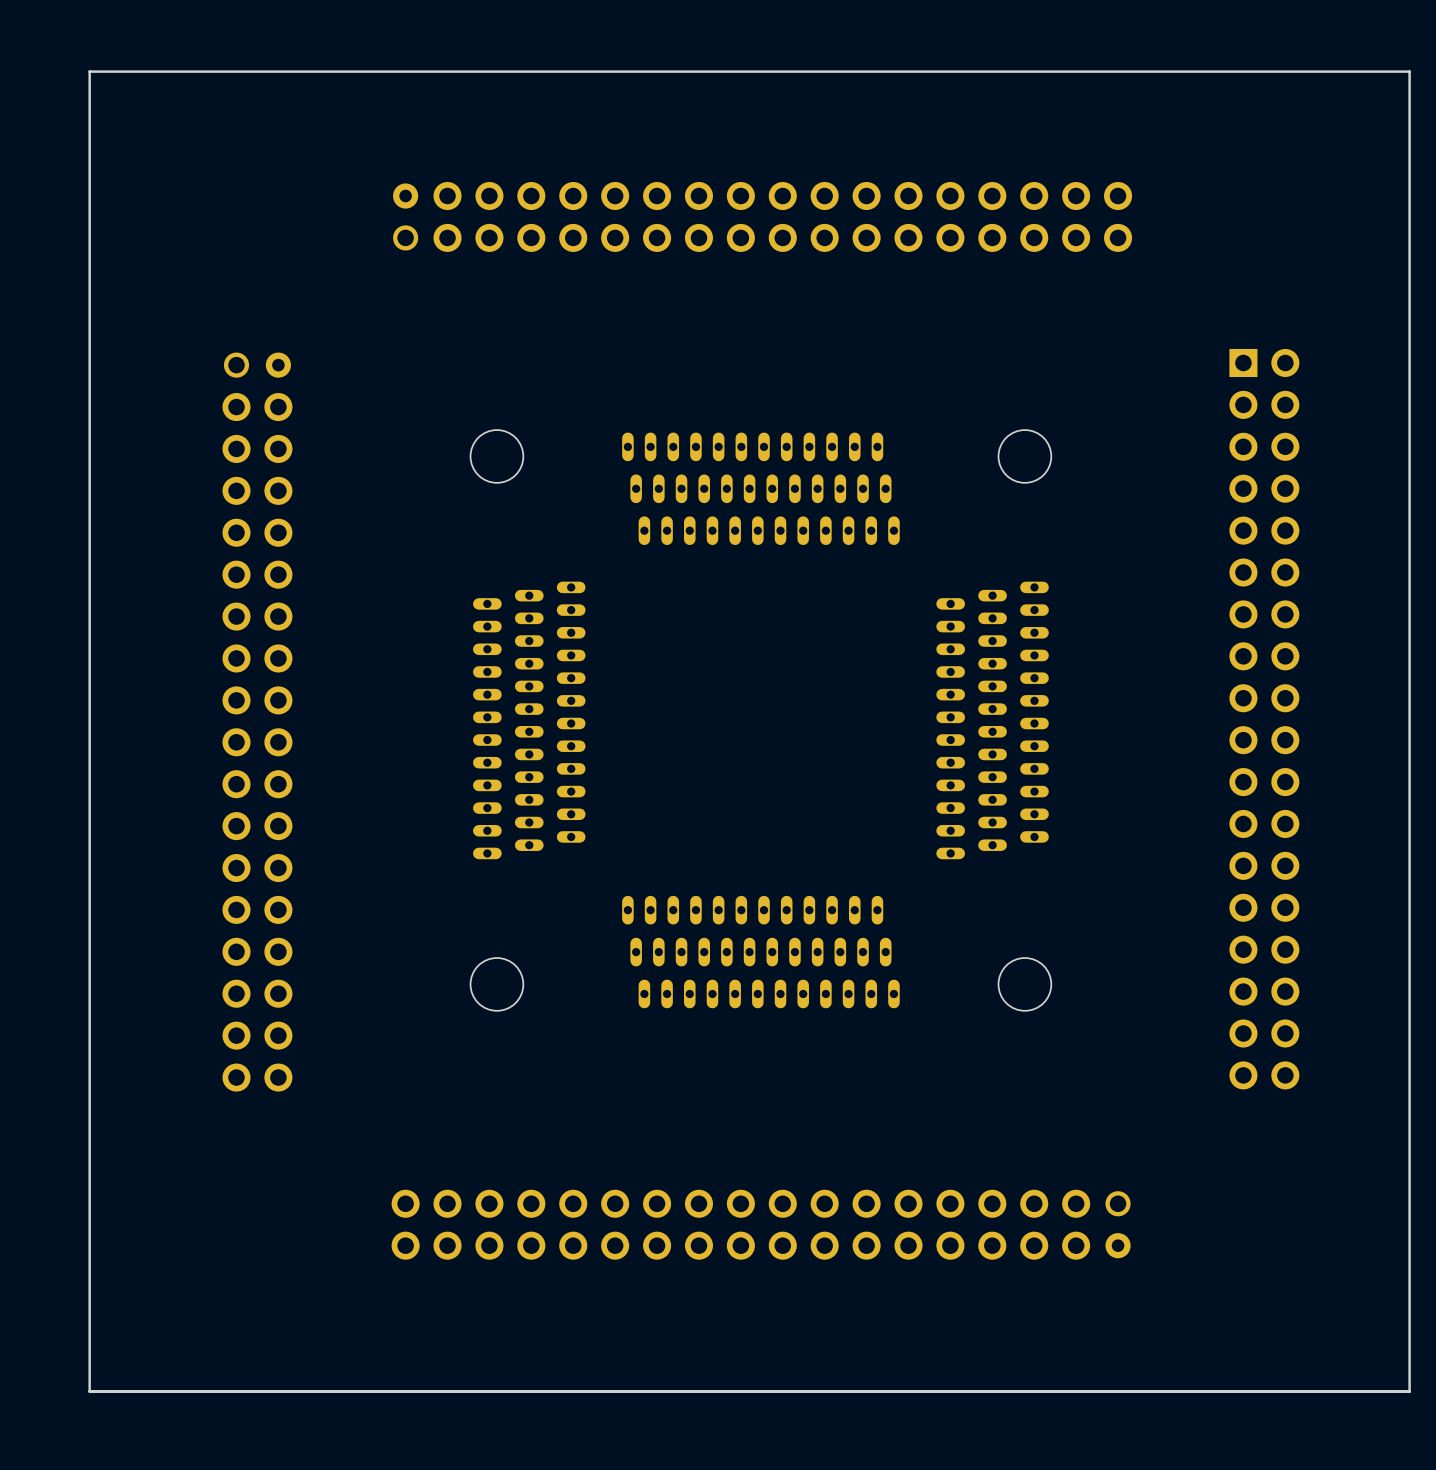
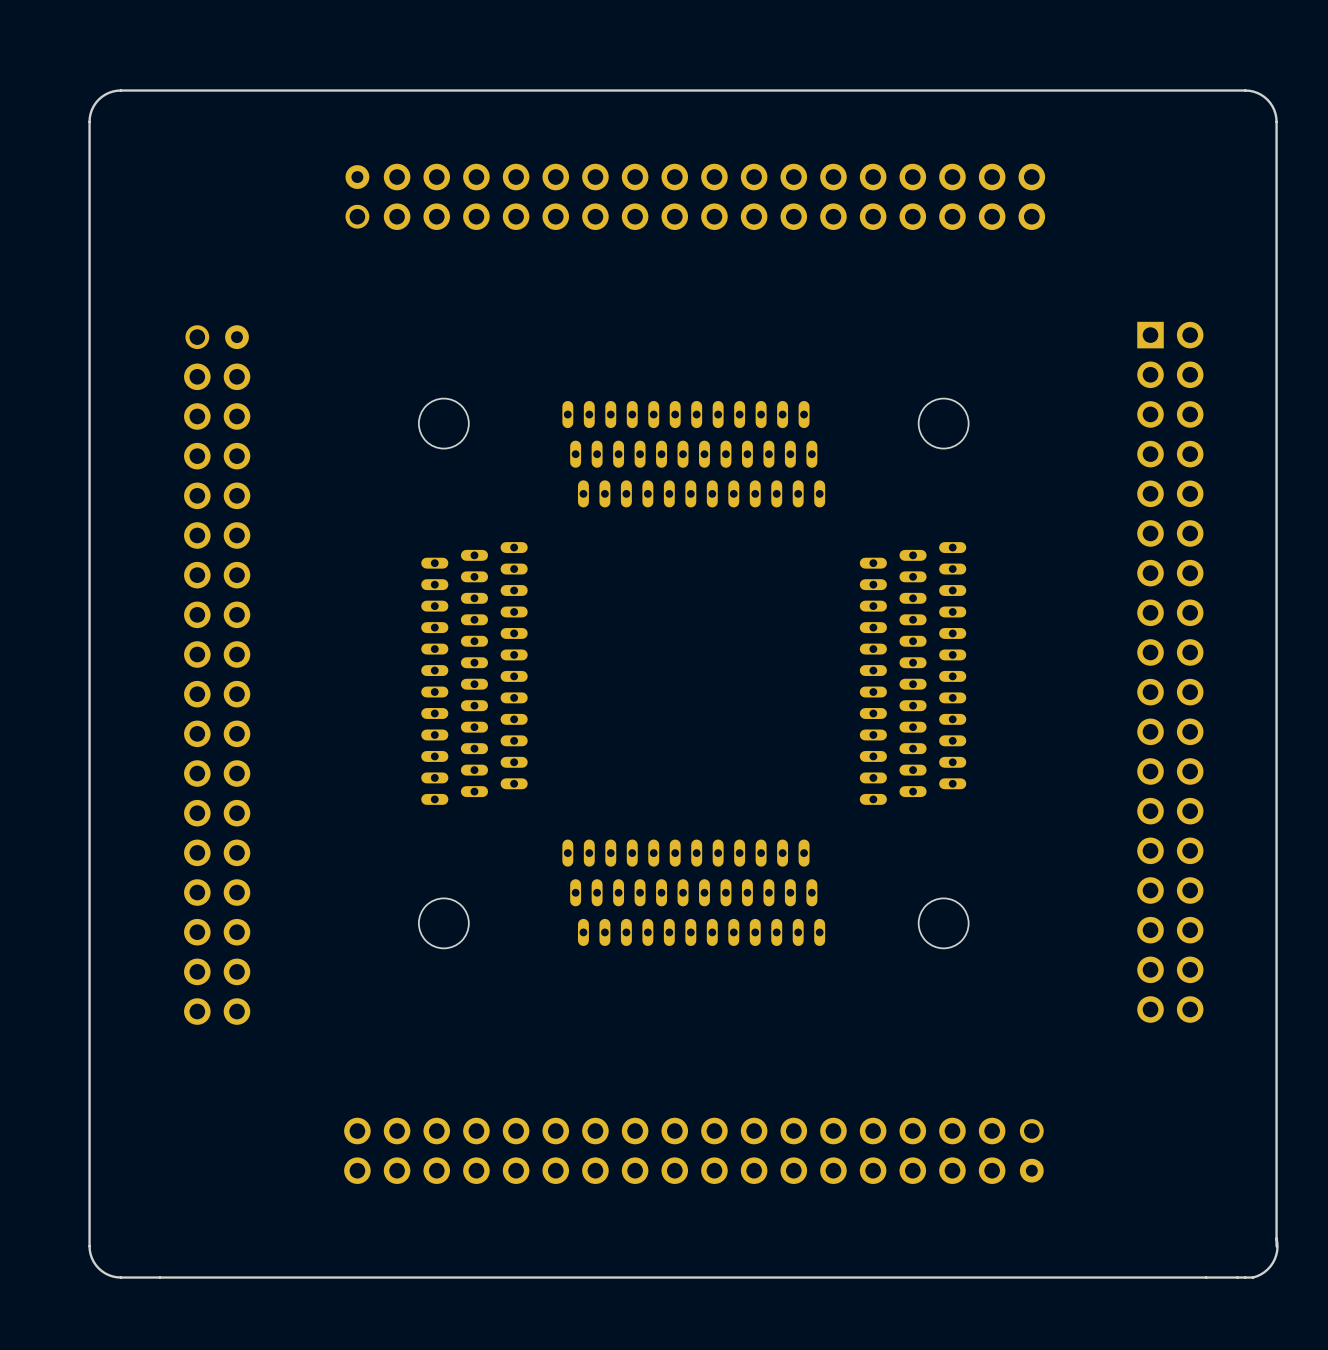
board edge: (1409, 71) (1409, 1391) (89, 1391) (89, 71) (1409, 71) -> none
board edge: none -> (1276, 1238) (1277, 1242) (1277, 1246) (1277, 1251) (1272, 1262) (1264, 1272) (1253, 1277) (120, 1277) (108, 1275) (98, 1268) (91, 1258) (89, 1246) (89, 121) (91, 109) (98, 99) (108, 92) (120, 90) (1245, 90) (1257, 92) (1267, 99) (1274, 109) (1276, 121) (1276, 1246)

